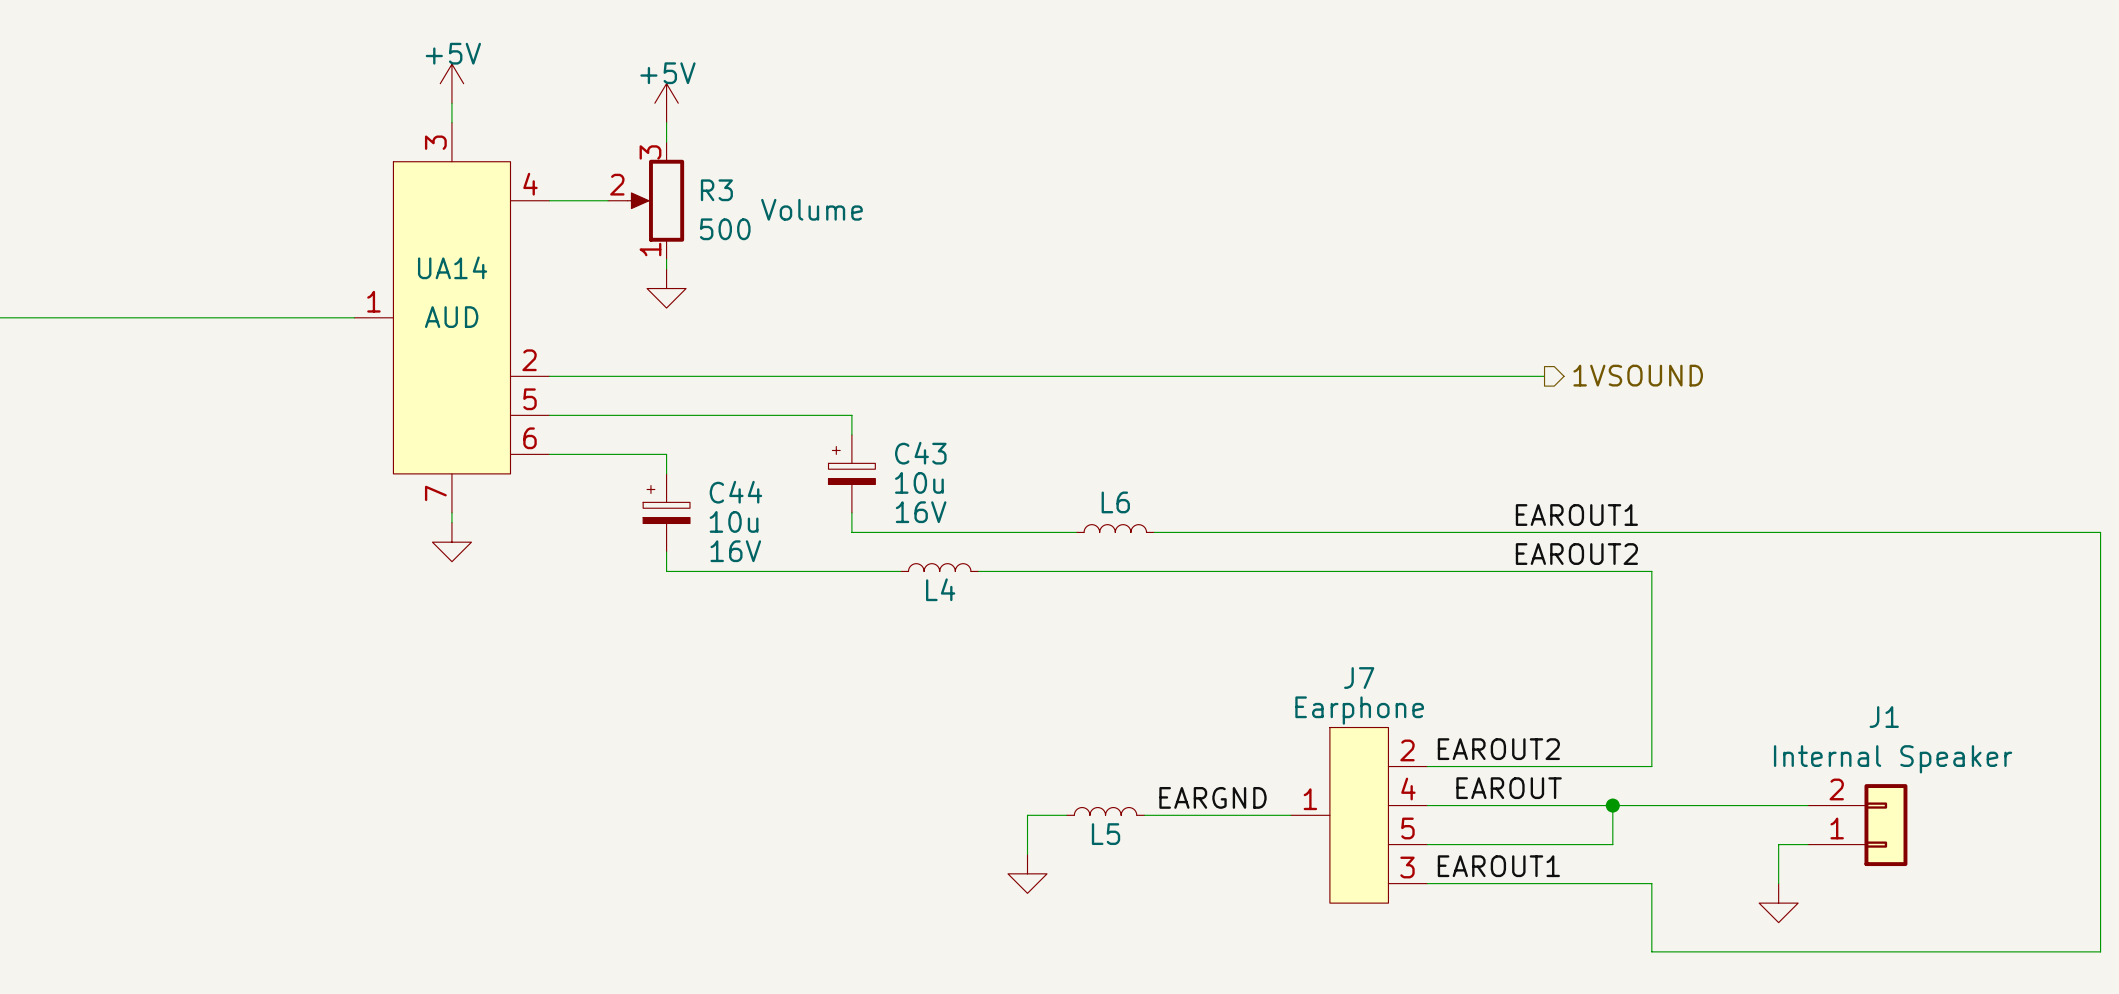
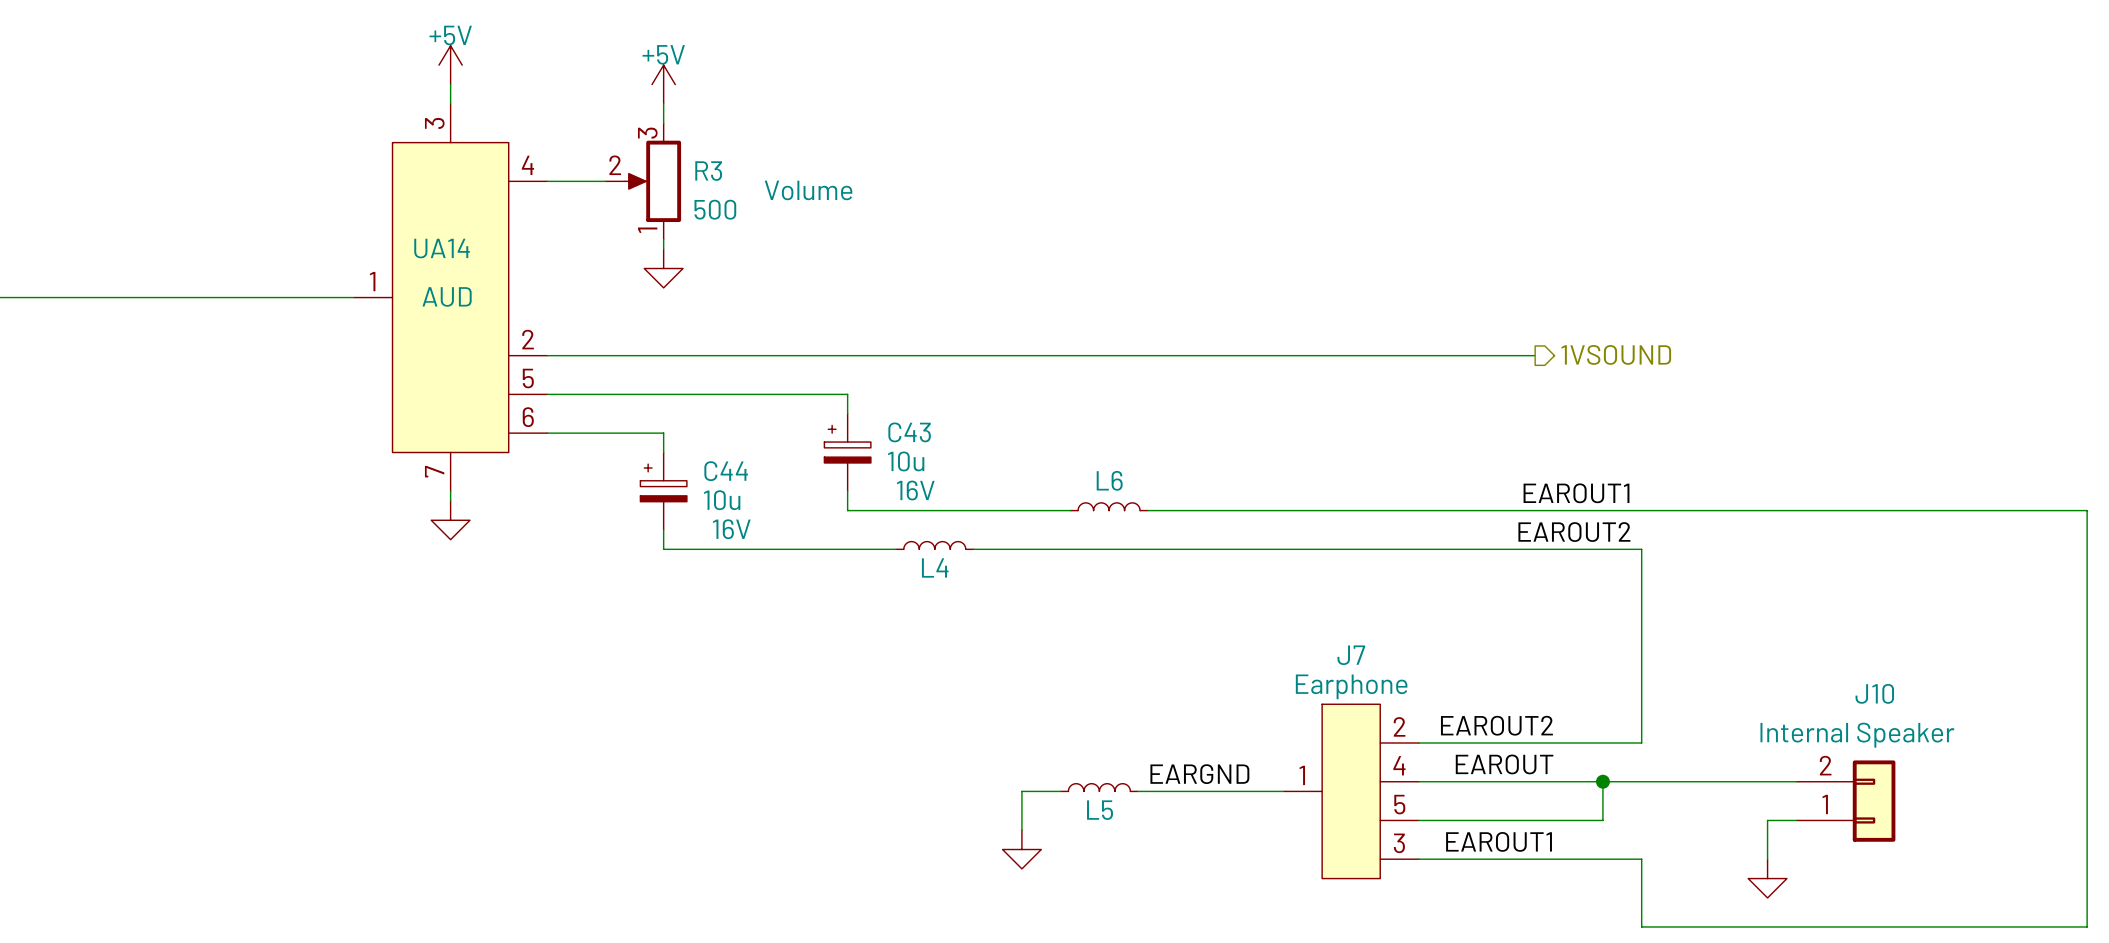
J1 name: J1 (1884, 717) -> J10 (1874, 693)

